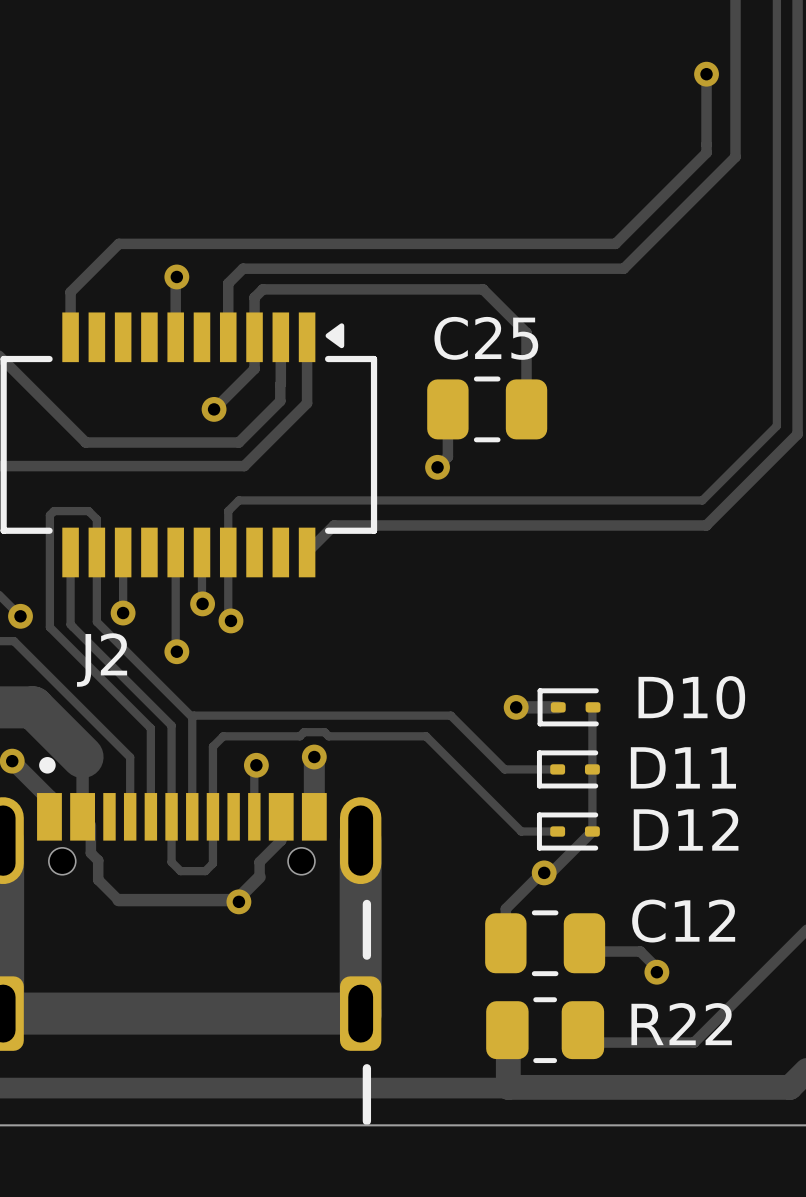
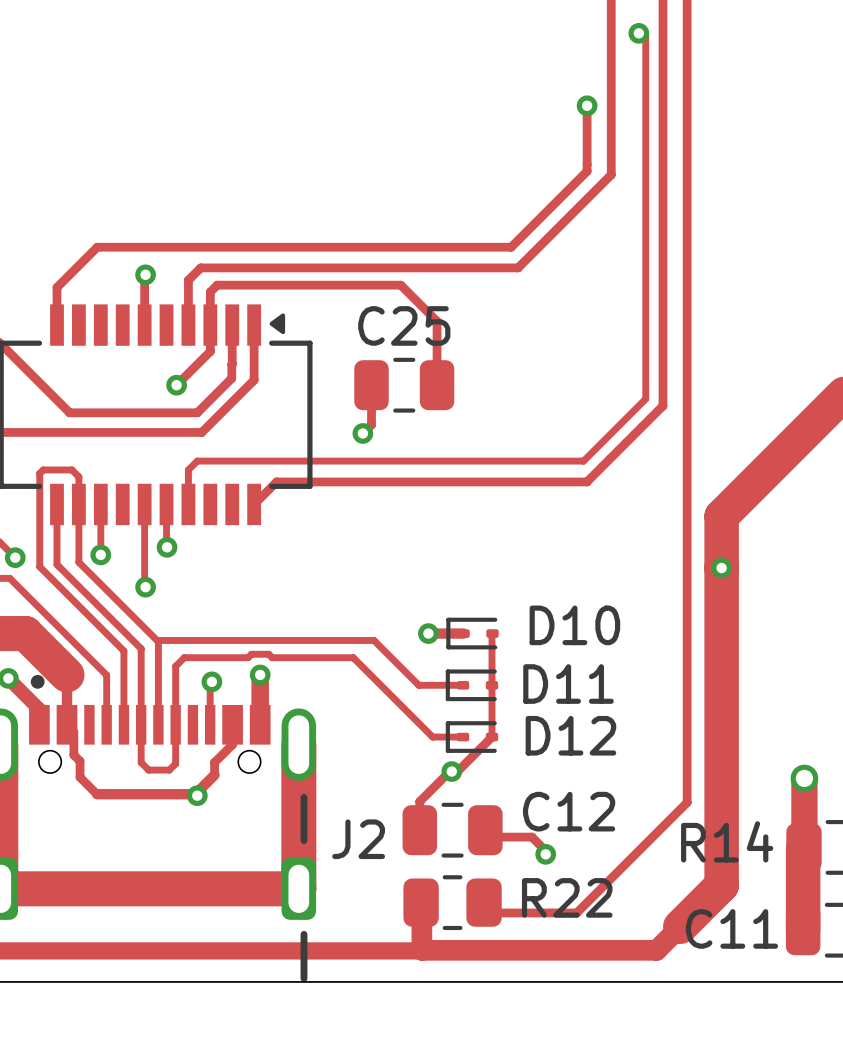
track: (228, 552) (228, 618) (230, 620) -> none
via: (230, 620) -> none
J2 name position: J2 (102, 660) -> J2 (358, 839)

